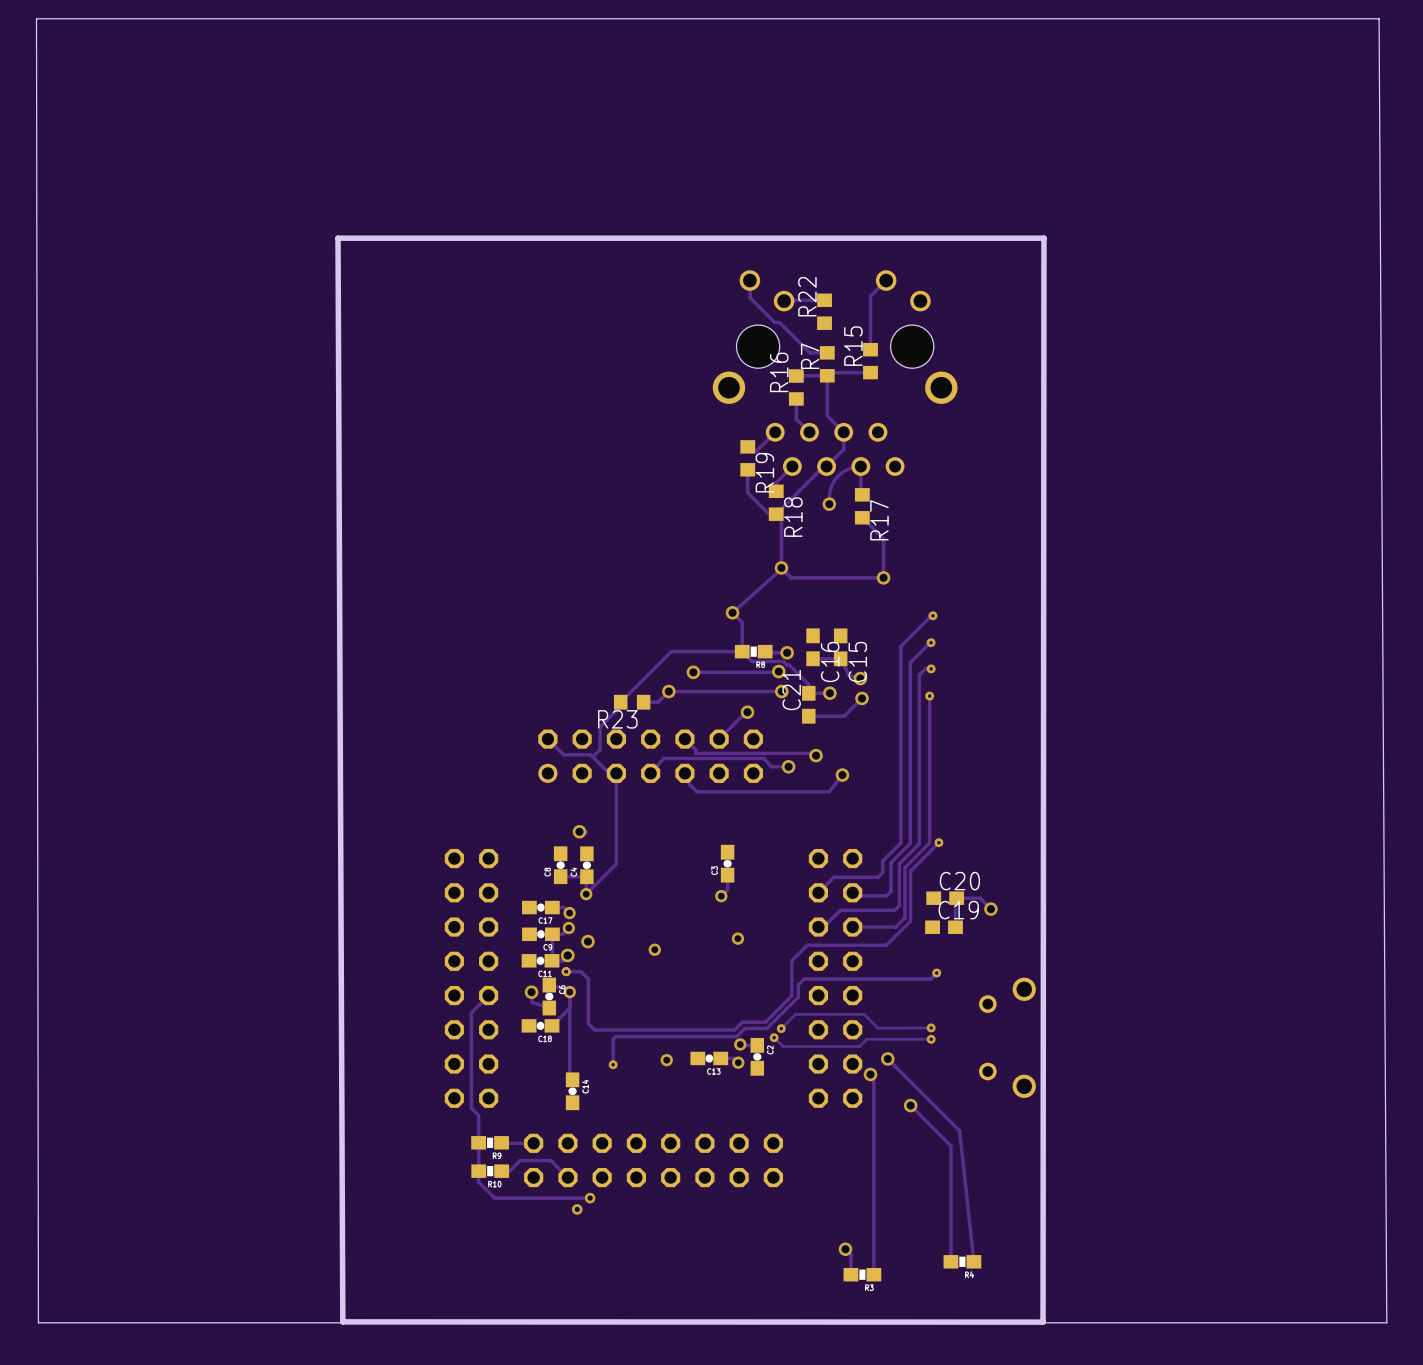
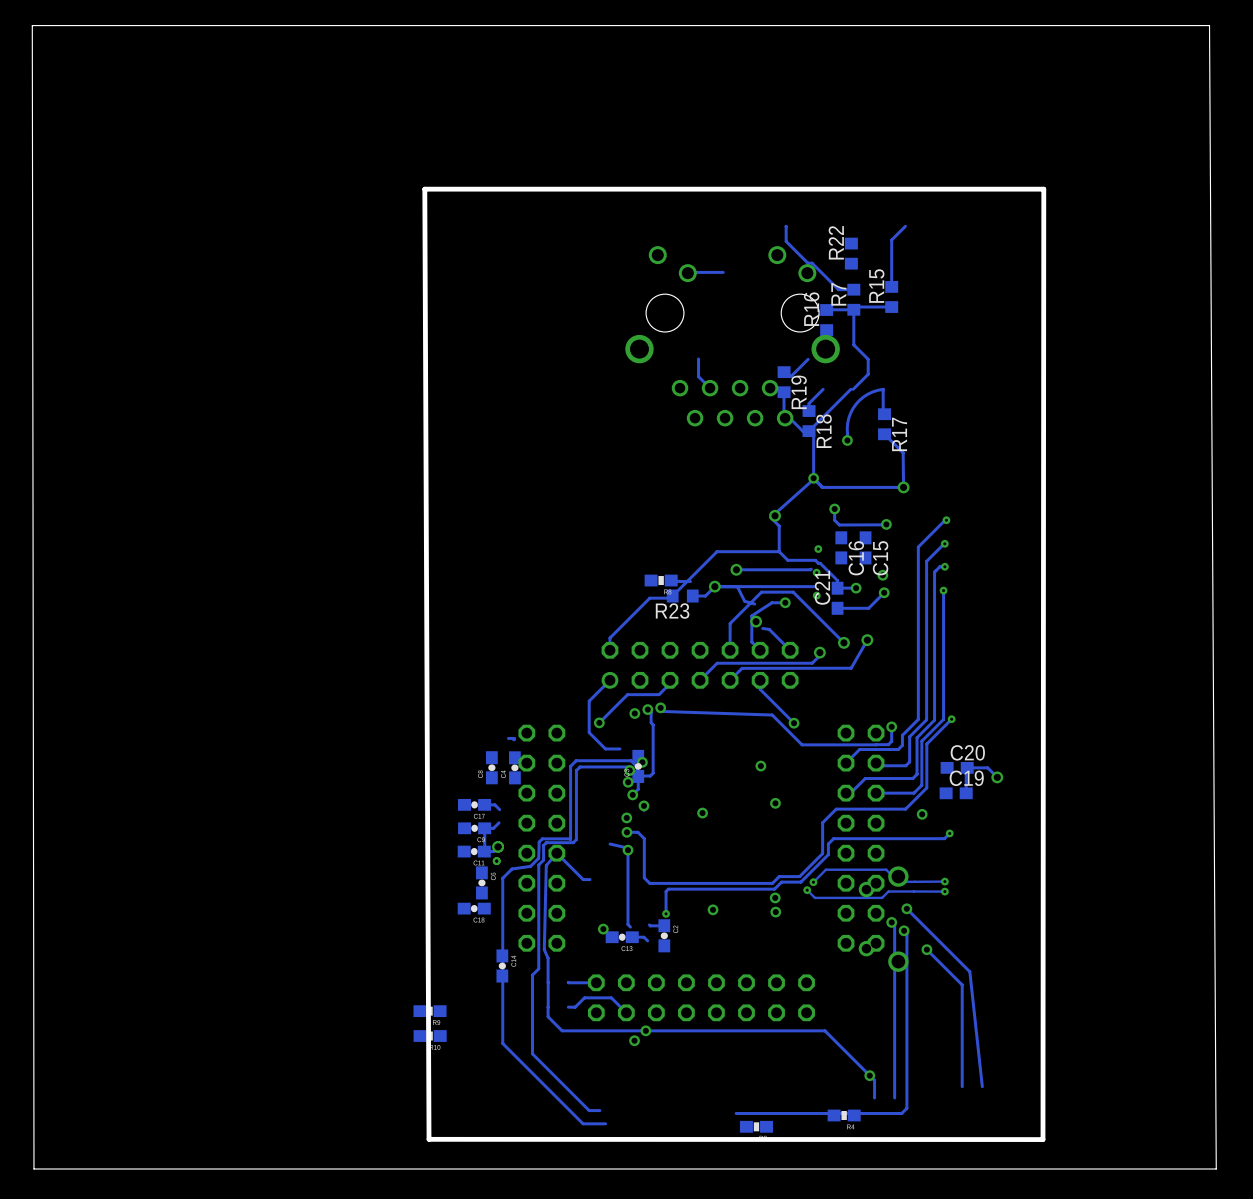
board edge: (1043, 238) (1043, 1322) (342, 1321) (338, 238) (1043, 238) -> (1043, 189) (1042, 1139) (429, 1139) (424, 189) (1043, 189)
track: (749, 280) (750, 297) (774, 322) (779, 322) (809, 352) (827, 352) -> (785, 226) (786, 241) (807, 263) (812, 263) (838, 289) (853, 289)
track: (886, 280) (870, 296) (870, 349) -> (905, 226) (891, 240) (891, 286)
R22 position: (824, 311) -> (851, 253)
R15 position: (870, 361) -> (891, 296)
R7 position: (827, 364) -> (853, 299)
track: (870, 372) (830, 372) (827, 375) -> (891, 307) (856, 307) (853, 309)
track: (827, 375) (796, 376) -> (853, 309) (826, 310)
track: (827, 375) (827, 415) (843, 432) (843, 449) (826, 466) -> (853, 309) (853, 344) (868, 359) (868, 374) (853, 389)
R16 position: (796, 387) -> (826, 320)
track: (775, 432) (755, 451) (747, 446) -> (808, 359) (791, 376) (784, 372)
R19 position: (747, 458) -> (784, 382)
track: none -> (883, 412) (883, 389) (863, 396) (850, 413) (847, 423) (847, 440)
track: (792, 466) (776, 482) (776, 491) -> (823, 389) (809, 403) (809, 411)
track: (823, 466) (776, 514) -> (850, 389) (809, 431)
track: (747, 469) (747, 492) (769, 514) (776, 514) -> (783, 392) (783, 412) (802, 431) (809, 431)
track: none -> (809, 431) (813, 435) (813, 478) (822, 487)
track: none -> (884, 434) (903, 452) (903, 487) (822, 487)
via: none -> (847, 440)
track: (860, 493) (860, 466) (848, 468) (841, 473) (833, 482) (829, 493) (829, 504) -> none
R18 position: (776, 502) -> (809, 421)
via: (829, 504) -> none
R17 position: (862, 506) -> (884, 424)
track: (776, 514) (781, 519) (781, 567) (791, 577) -> none
track: (862, 517) (883, 538) (883, 577) (791, 577) (781, 568) (732, 612) (742, 622) (742, 651) -> none
via: none -> (813, 478)
track: none -> (822, 487) (814, 478) (770, 517) (779, 526) (779, 551)
via: none -> (903, 487)
via: (781, 567) -> none
track: none -> (834, 509) (834, 520) (839, 525) (886, 524)
via: none -> (834, 509)
via: none -> (946, 520)
via: none -> (886, 524)
via: none -> (944, 543)
via: (732, 612) -> none
track: (932, 615) (900, 646) (900, 842) (882, 861) (882, 872) (878, 877) (833, 877) (818, 892) -> (946, 520) (918, 547) (918, 719) (902, 735) (902, 745) (898, 749) (859, 749) (846, 763)
track: none -> (779, 551) (717, 551) (670, 598) (649, 598) (609, 638) (609, 650)
via: none -> (944, 566)
via: none -> (736, 569)
track: (931, 642) (910, 662) (910, 843) (891, 862) (891, 891) (886, 895) (855, 895) (852, 892) -> (944, 543) (926, 561) (926, 719) (909, 736) (909, 762) (905, 765) (878, 765) (876, 763)
via: none -> (882, 575)
C16 position: (813, 647) -> (841, 547)
C15 position: (840, 647) -> (865, 547)
track: (742, 651) (752, 661) (783, 661) (789, 664) (808, 684) (808, 693) (829, 693) -> (779, 551) (787, 560) (815, 560) (820, 563) (837, 580) (837, 588) (856, 588)
track: (742, 651) (671, 651) (620, 702) (620, 706) (600, 727) (600, 749) (592, 756) -> none
via: (787, 652) -> none
via: none -> (714, 586)
via: none -> (856, 588)
via: none -> (943, 590)
via: none -> (884, 592)
track: (931, 668) (925, 668) (919, 674) (919, 843) (899, 863) (899, 905) (894, 910) (840, 910) (823, 927) (818, 927) -> (944, 566) (939, 566) (934, 572) (934, 720) (917, 737) (917, 774) (912, 778) (865, 778) (850, 793) (846, 793)
track: (778, 671) (693, 672) -> (811, 569) (736, 569)
via: (778, 671) -> none
via: (693, 672) -> none
track: none -> (785, 602) (771, 602) (751, 615) (751, 641) (760, 650)
via: none -> (785, 602)
via: (860, 678) -> none
via: (668, 691) -> none
track: (781, 691) (668, 691) (658, 702) (643, 702) -> (813, 586) (714, 586) (705, 596) (692, 596)
via: (781, 691) -> none
via: (829, 693) -> none
track: (929, 696) (929, 842) (904, 867) (904, 917) (895, 927) (852, 927) -> (943, 590) (943, 719) (921, 741) (921, 785) (913, 793) (876, 793)
via: (929, 696) -> none
track: (861, 698) (844, 716) (808, 716) -> (884, 592) (868, 608) (837, 608)
R23 position: (632, 702) -> (682, 596)
C21 position: (808, 704) -> (837, 598)
track: none -> (762, 628) (769, 629) (790, 650)
track: (747, 712) (719, 739) -> none
via: (747, 712) -> none
track: none -> (867, 640) (851, 668) (742, 668) (730, 680)
via: none -> (867, 640)
track: none -> (843, 640) (843, 642) (793, 592) (761, 592) (730, 623) (730, 650)
via: none -> (843, 642)
track: none -> (819, 652) (819, 655) (812, 663) (717, 663) (700, 680)
via: none -> (819, 652)
track: (547, 739) (563, 754) (590, 754) (609, 773) (616, 773) (616, 863) (586, 894) (586, 876) (560, 876) -> none
track: (684, 739) (695, 749) (695, 753) (815, 753) (816, 755) -> none
via: (816, 755) -> none
part position: (650, 756) -> (700, 665)
track: none -> (609, 680) (589, 701) (589, 732) (605, 748) (620, 748)
track: none -> (670, 680) (670, 683) (659, 694) (627, 694) (599, 722)
track: none -> (760, 680) (760, 689) (794, 723)
track: (788, 766) (771, 766) (764, 758) (663, 758) (650, 773) -> none
via: (788, 766) -> none
track: (684, 773) (689, 777) (689, 784) (697, 791) (829, 791) (842, 775) -> none
via: (842, 775) -> none
track: none -> (660, 707) (664, 711) (772, 715) (802, 744) (888, 744) (891, 741) (891, 726)
via: none -> (660, 707)
track: none -> (647, 709) (651, 712) (651, 722) (653, 724) (653, 773) (650, 776)
via: none -> (647, 709)
via: none -> (634, 713)
track: none -> (951, 719) (926, 744) (926, 787) (905, 809) (836, 809) (822, 822) (822, 853) (799, 876) (779, 876) (772, 883) (649, 883) (644, 877) (644, 838) (637, 832) (626, 832)
via: none -> (951, 719)
via: none -> (599, 722)
via: none -> (794, 723)
via: none -> (891, 726)
via: (579, 831) -> none
track: (938, 842) (910, 871) (910, 921) (886, 945) (807, 945) (791, 960) (791, 995) (765, 1022) (742, 1022) (734, 1029) (594, 1029) (588, 1023) (588, 978) (581, 971) (566, 971) -> none
via: (938, 842) -> none
via: none -> (642, 762)
via: none -> (760, 766)
track: none -> (629, 770) (629, 766) (580, 766) (576, 770) (576, 839) (573, 842) (546, 842) (543, 845) (543, 860) (538, 864) (538, 968) (532, 975) (532, 1053) (589, 1110) (599, 1110)
via: none -> (629, 770)
track: none -> (650, 776) (643, 776) (630, 760) (576, 760) (570, 766) (570, 839) (542, 838) (539, 842) (538, 858) (530, 866) (512, 868) (502, 878) (502, 1043) (583, 1123) (605, 1123)
via: none -> (997, 777)
via: none -> (628, 782)
via: (586, 894) -> none
C20 position: (945, 898) -> (957, 767)
via: none -> (775, 803)
via: none -> (643, 805)
track: (990, 909) (980, 898) (956, 898) (955, 927) -> (997, 777) (987, 767) (967, 767) (966, 793)
via: (990, 909) -> none
via: (569, 913) -> none
via: none -> (702, 813)
via: none -> (922, 814)
via: none -> (626, 817)
C19 position: (944, 927) -> (956, 793)
via: (568, 928) -> none
via: none -> (626, 832)
via: (737, 938) -> none
via: none -> (949, 833)
via: (587, 941) -> none
part: none -> (541, 838)
part: none -> (861, 838)
via: (654, 949) -> none
via: none -> (627, 850)
track: (936, 973) (930, 978) (804, 978) (798, 984) (798, 997) (767, 1028) (744, 1028) (736, 1036) (615, 1036) (613, 1039) (613, 1064) -> (949, 833) (944, 838) (833, 838) (828, 843) (828, 854) (800, 882) (781, 882) (774, 889) (668, 889) (666, 891) (666, 913)
via: (936, 973) -> none
part: (471, 978) -> none
part: (835, 978) -> none
track: (549, 985) (566, 989) (569, 992) (569, 1076) (572, 1079) -> (610, 844) (625, 847) (627, 850) (627, 924) (630, 927)
track: (531, 992) (532, 1002) (549, 1007) -> none
via: (531, 992) -> none
via: (569, 992) -> none
track: none -> (590, 879) (583, 879) (556, 853) (546, 865) (544, 949) (548, 958) (548, 982)
track: (488, 995) (471, 1012) (471, 1108) (478, 1115) (478, 1142) -> none
via: none -> (813, 882)
via: none -> (944, 881)
via: none -> (807, 890)
via: none -> (944, 891)
track: (569, 1008) (551, 1025) -> none
via: none -> (775, 897)
via: none -> (906, 908)
via: none -> (713, 909)
track: (931, 1027) (877, 1028) (864, 1014) (795, 1014) (781, 1028) -> (944, 881) (898, 881) (886, 869) (825, 869) (813, 882)
via: (931, 1027) -> none
via: (781, 1028) -> none
via: none -> (775, 912)
via: none -> (666, 913)
track: (774, 1037) (782, 1046) (859, 1046) (866, 1039) (931, 1039) -> (807, 890) (814, 897) (882, 897) (888, 891) (944, 891)
via: (774, 1037) -> none
via: (931, 1039) -> none
via: none -> (891, 922)
via: (740, 1044) -> none
track: none -> (904, 930) (906, 933) (906, 1108) (901, 1113) (736, 1113)
via: none -> (904, 930)
track: (887, 1058) (959, 1130) (973, 1261) -> (906, 908) (969, 971) (982, 1086)
via: (887, 1058) -> none
via position: (666, 1060) -> (603, 929)
via: (738, 1062) -> none
via: (613, 1064) -> none
via: none -> (926, 949)
track: (870, 1074) (873, 1077) (873, 1274) -> (891, 922) (894, 925) (894, 1097)
via: (870, 1074) -> none
track: (910, 1105) (950, 1145) (950, 1261) -> (926, 949) (962, 985) (962, 1086)
via: (910, 1105) -> none
part: none -> (701, 997)
track: none -> (548, 1007) (548, 1016) (562, 1030) (824, 1030) (874, 1080) (874, 1097)
track: (478, 1142) (478, 1171) -> (548, 982) (548, 1007)
track: (501, 1142) (533, 1143) -> (568, 982) (596, 982)
part: (653, 1160) -> none
via: none -> (645, 1030)
track: (478, 1171) (478, 1182) (494, 1198) (590, 1198) -> none
track: (501, 1171) (509, 1171) (520, 1160) (550, 1160) (567, 1177) -> (568, 1007) (575, 1007) (584, 997) (611, 997) (626, 1012)
via: none -> (634, 1040)
via: (590, 1198) -> none
via: (577, 1209) -> none
via: none -> (869, 1075)
track: (845, 1249) (850, 1254) (850, 1274) -> none
via: (845, 1249) -> none

